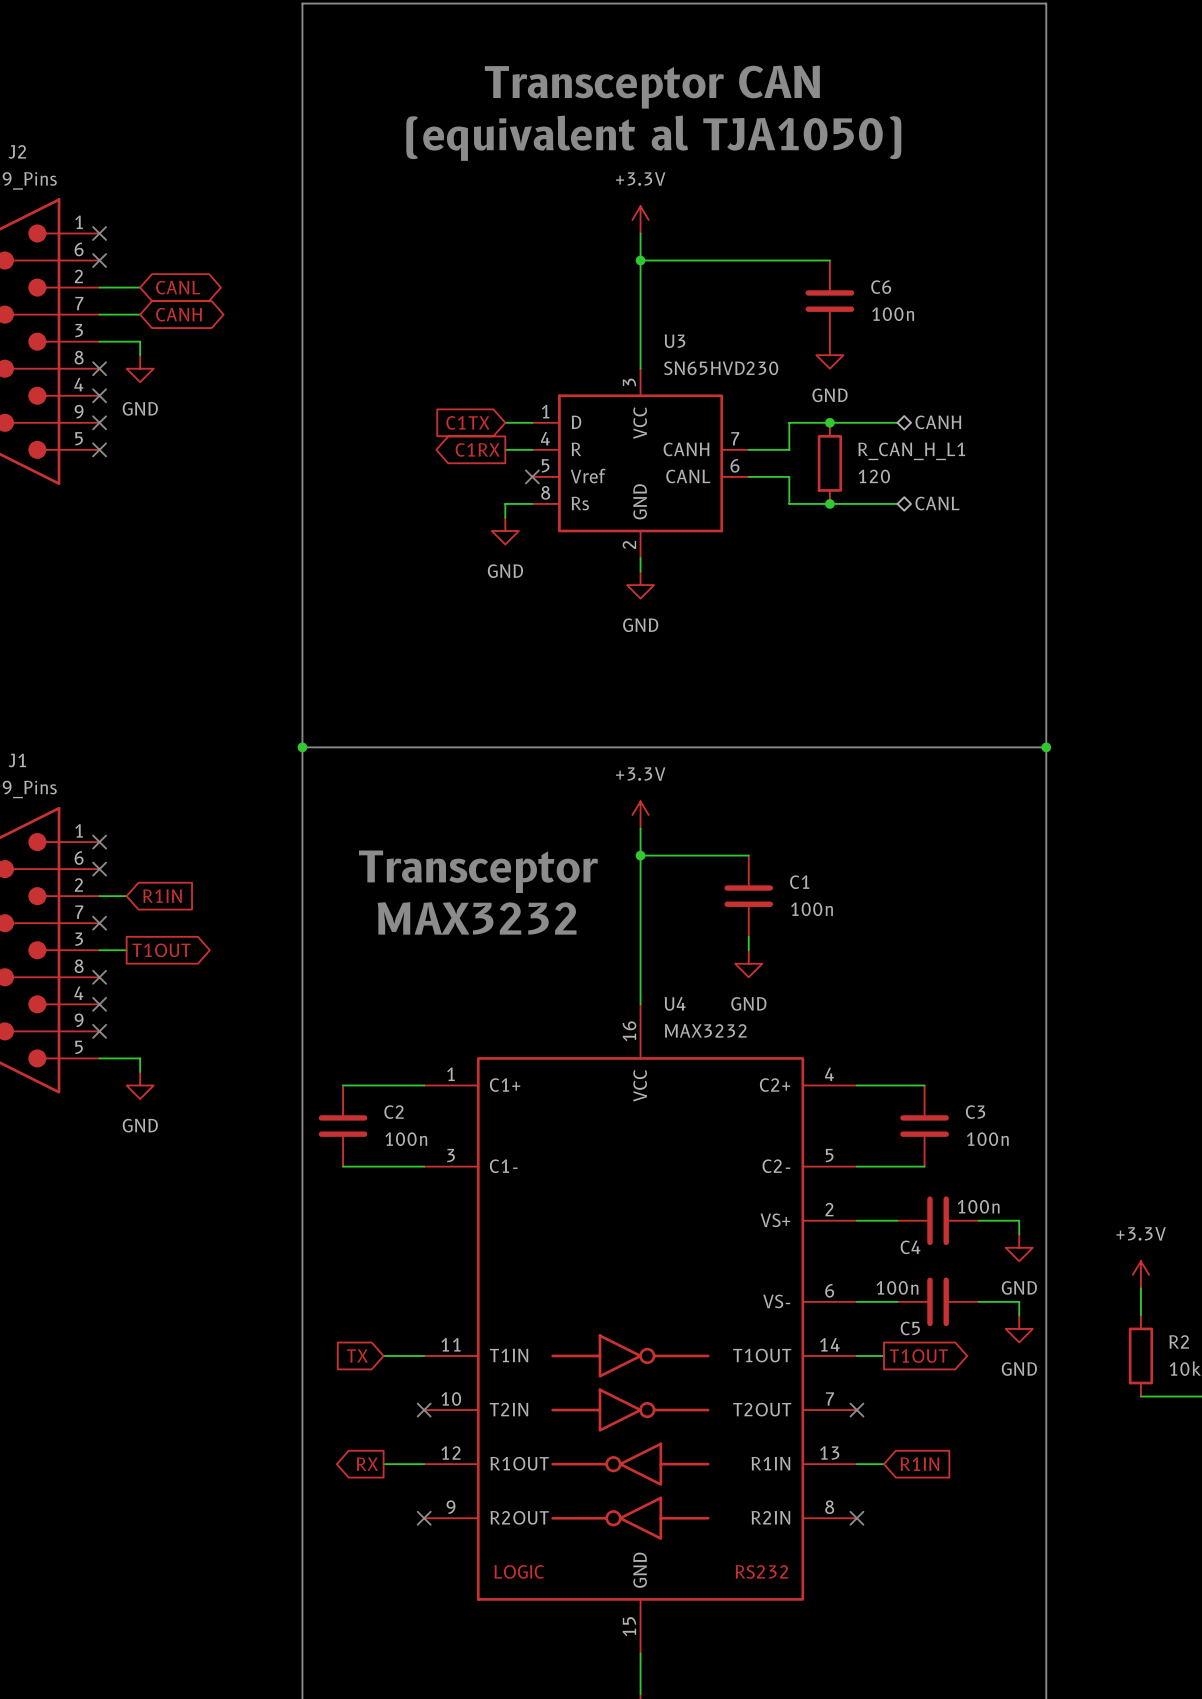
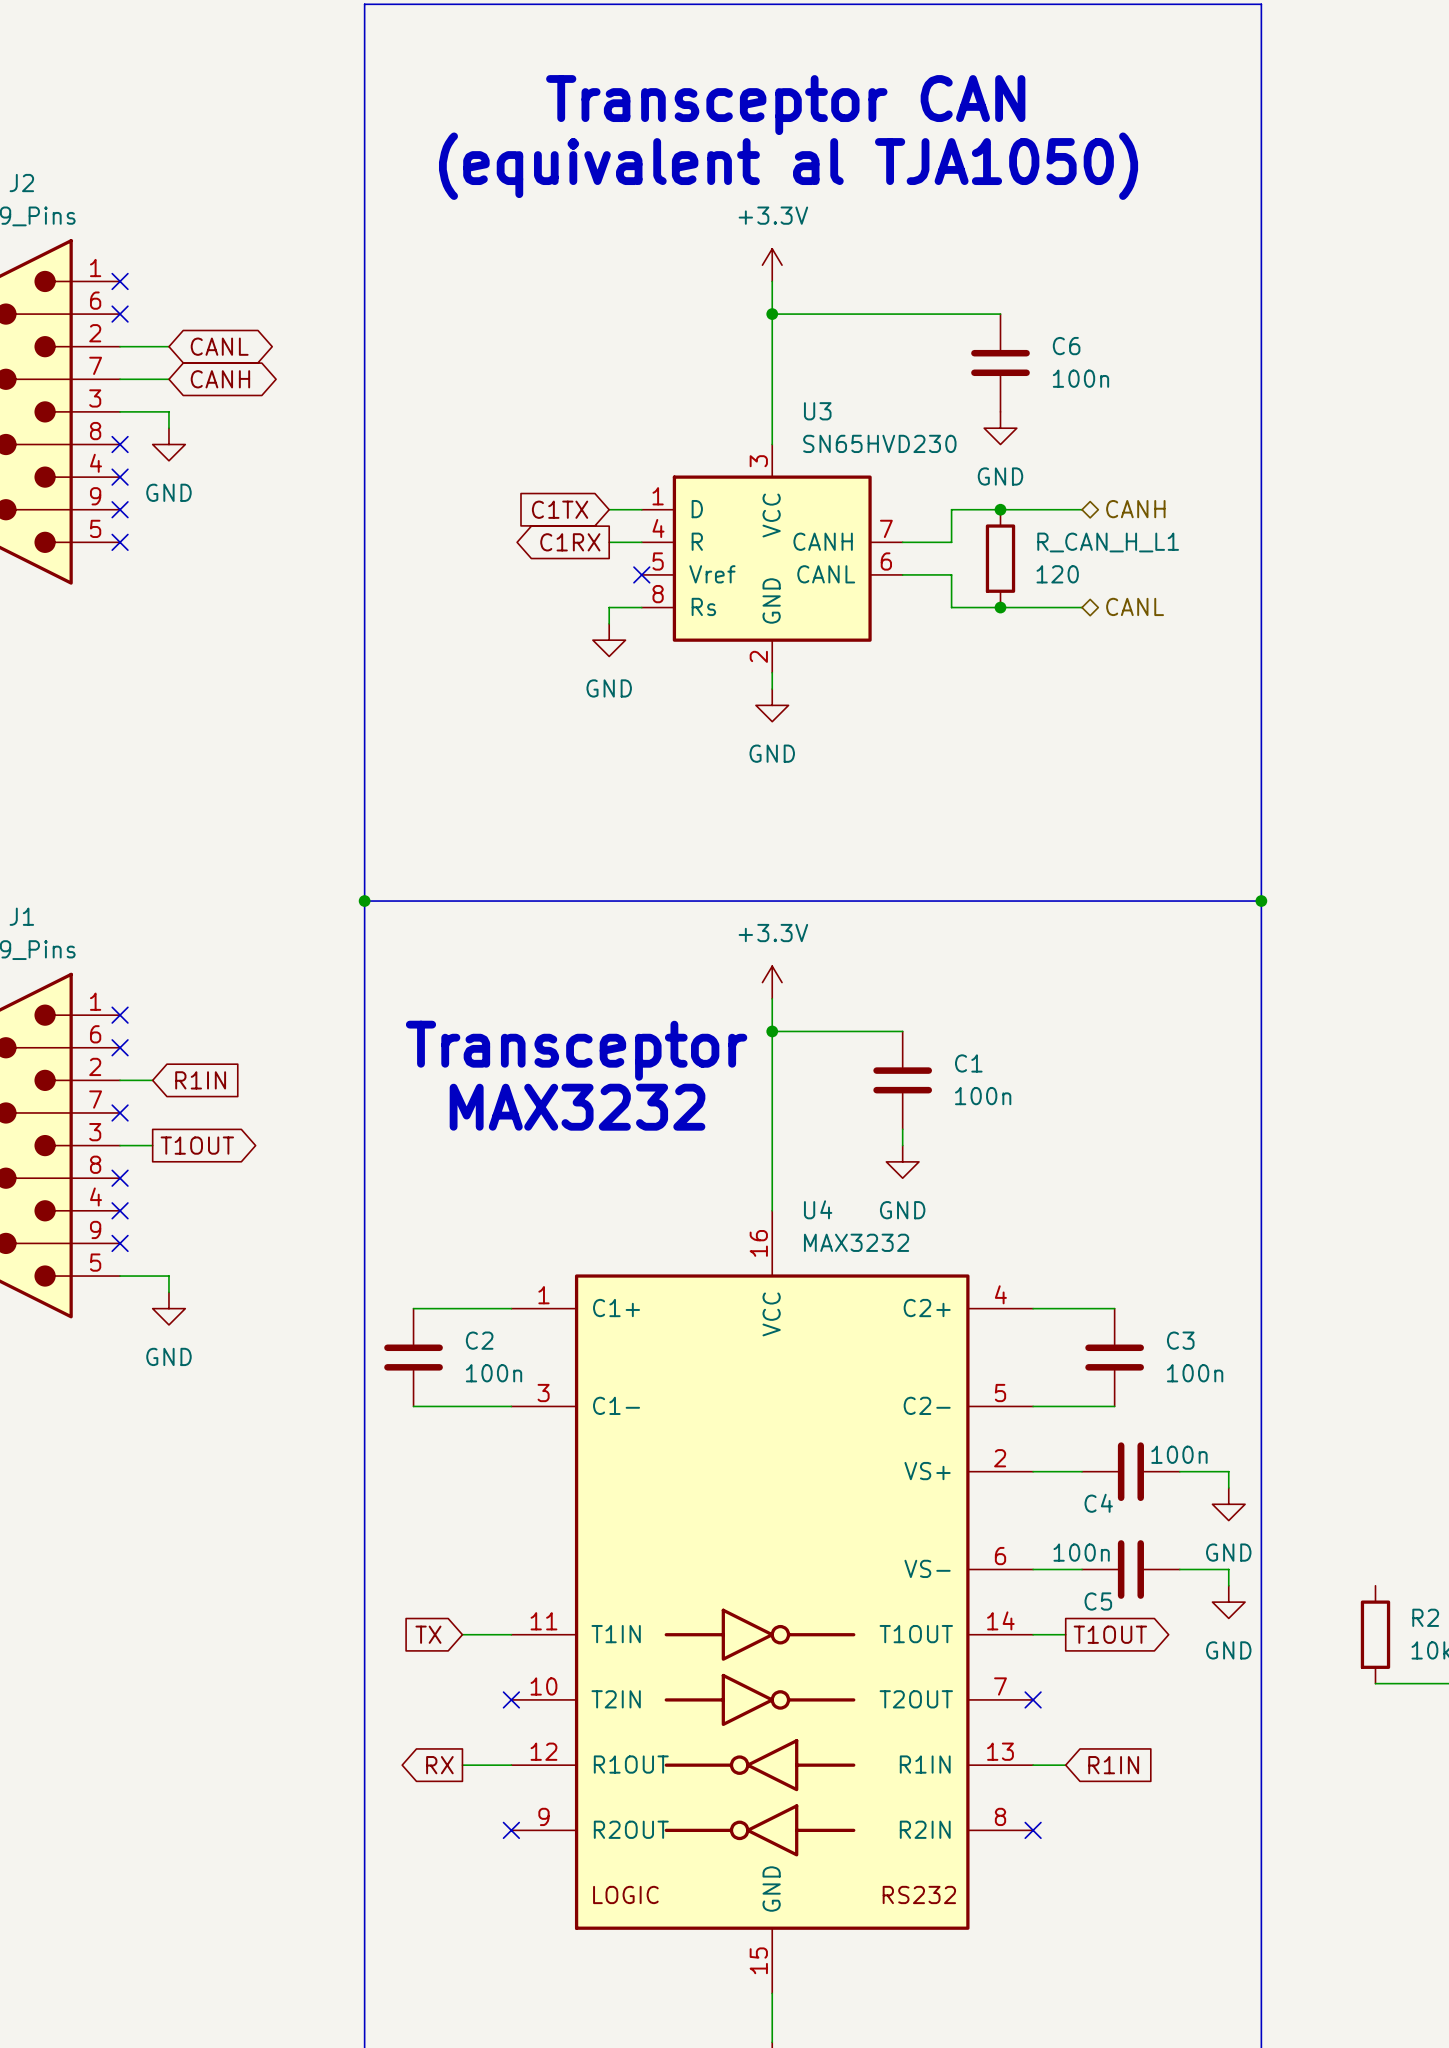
power symbol: +3.3V (1140, 1274) -> none
wire: (1140, 1288) (1140, 1315) -> none

